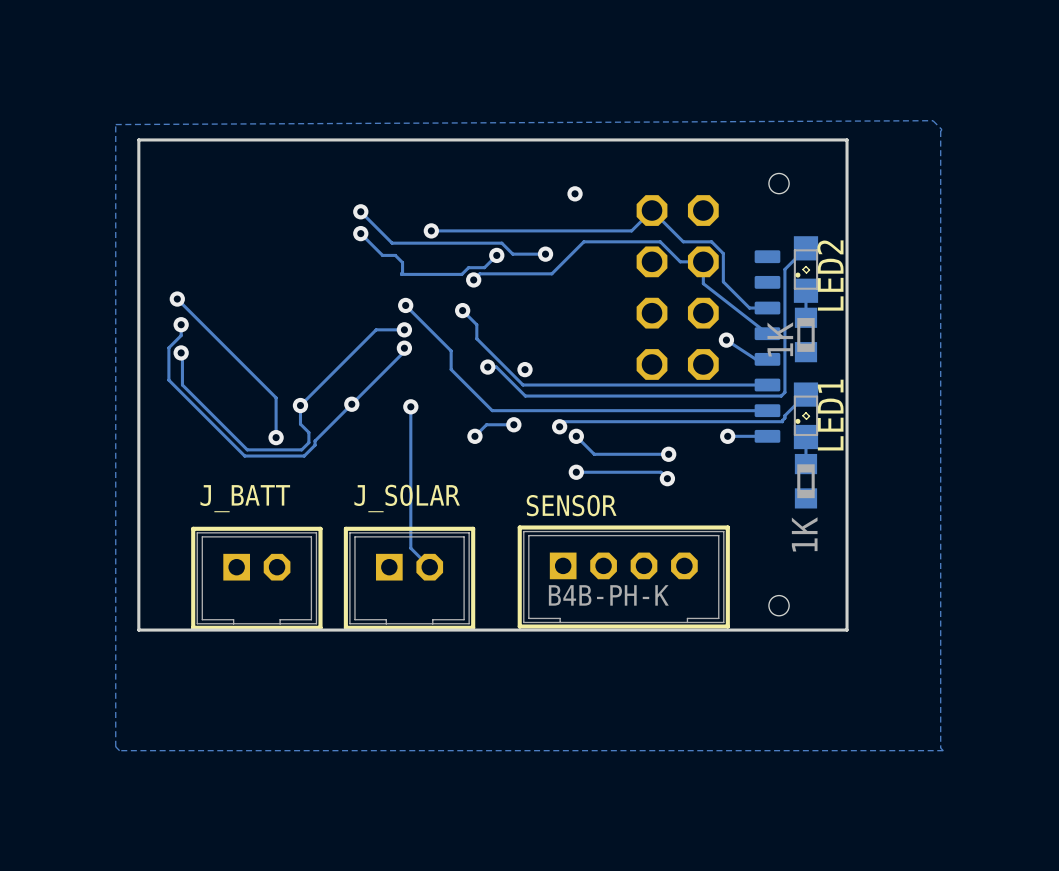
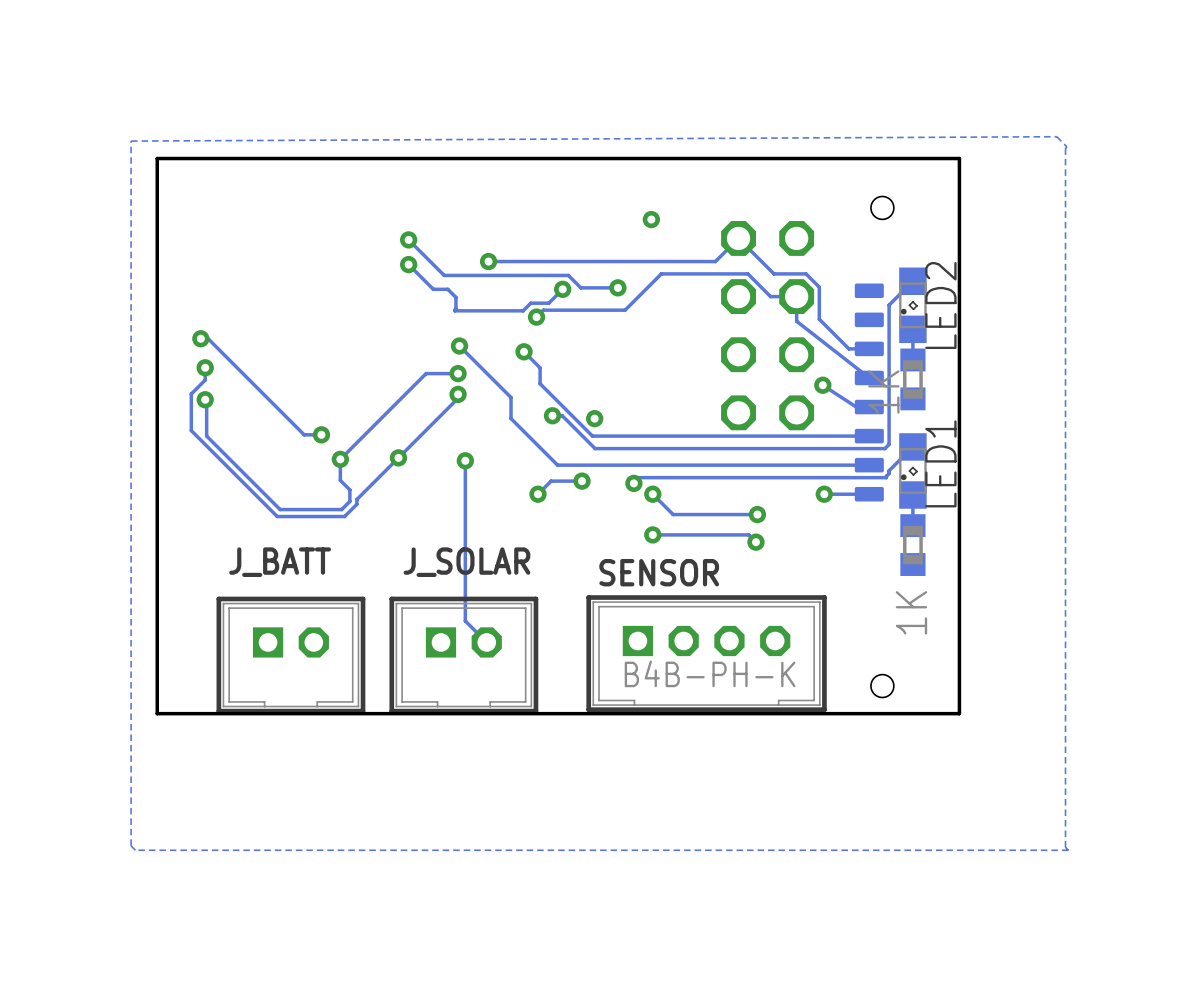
track: none -> (203, 334) (304, 434) (321, 434)
track: (177, 299) (276, 397) (276, 437) -> none
via position: (276, 437) -> (321, 434)

